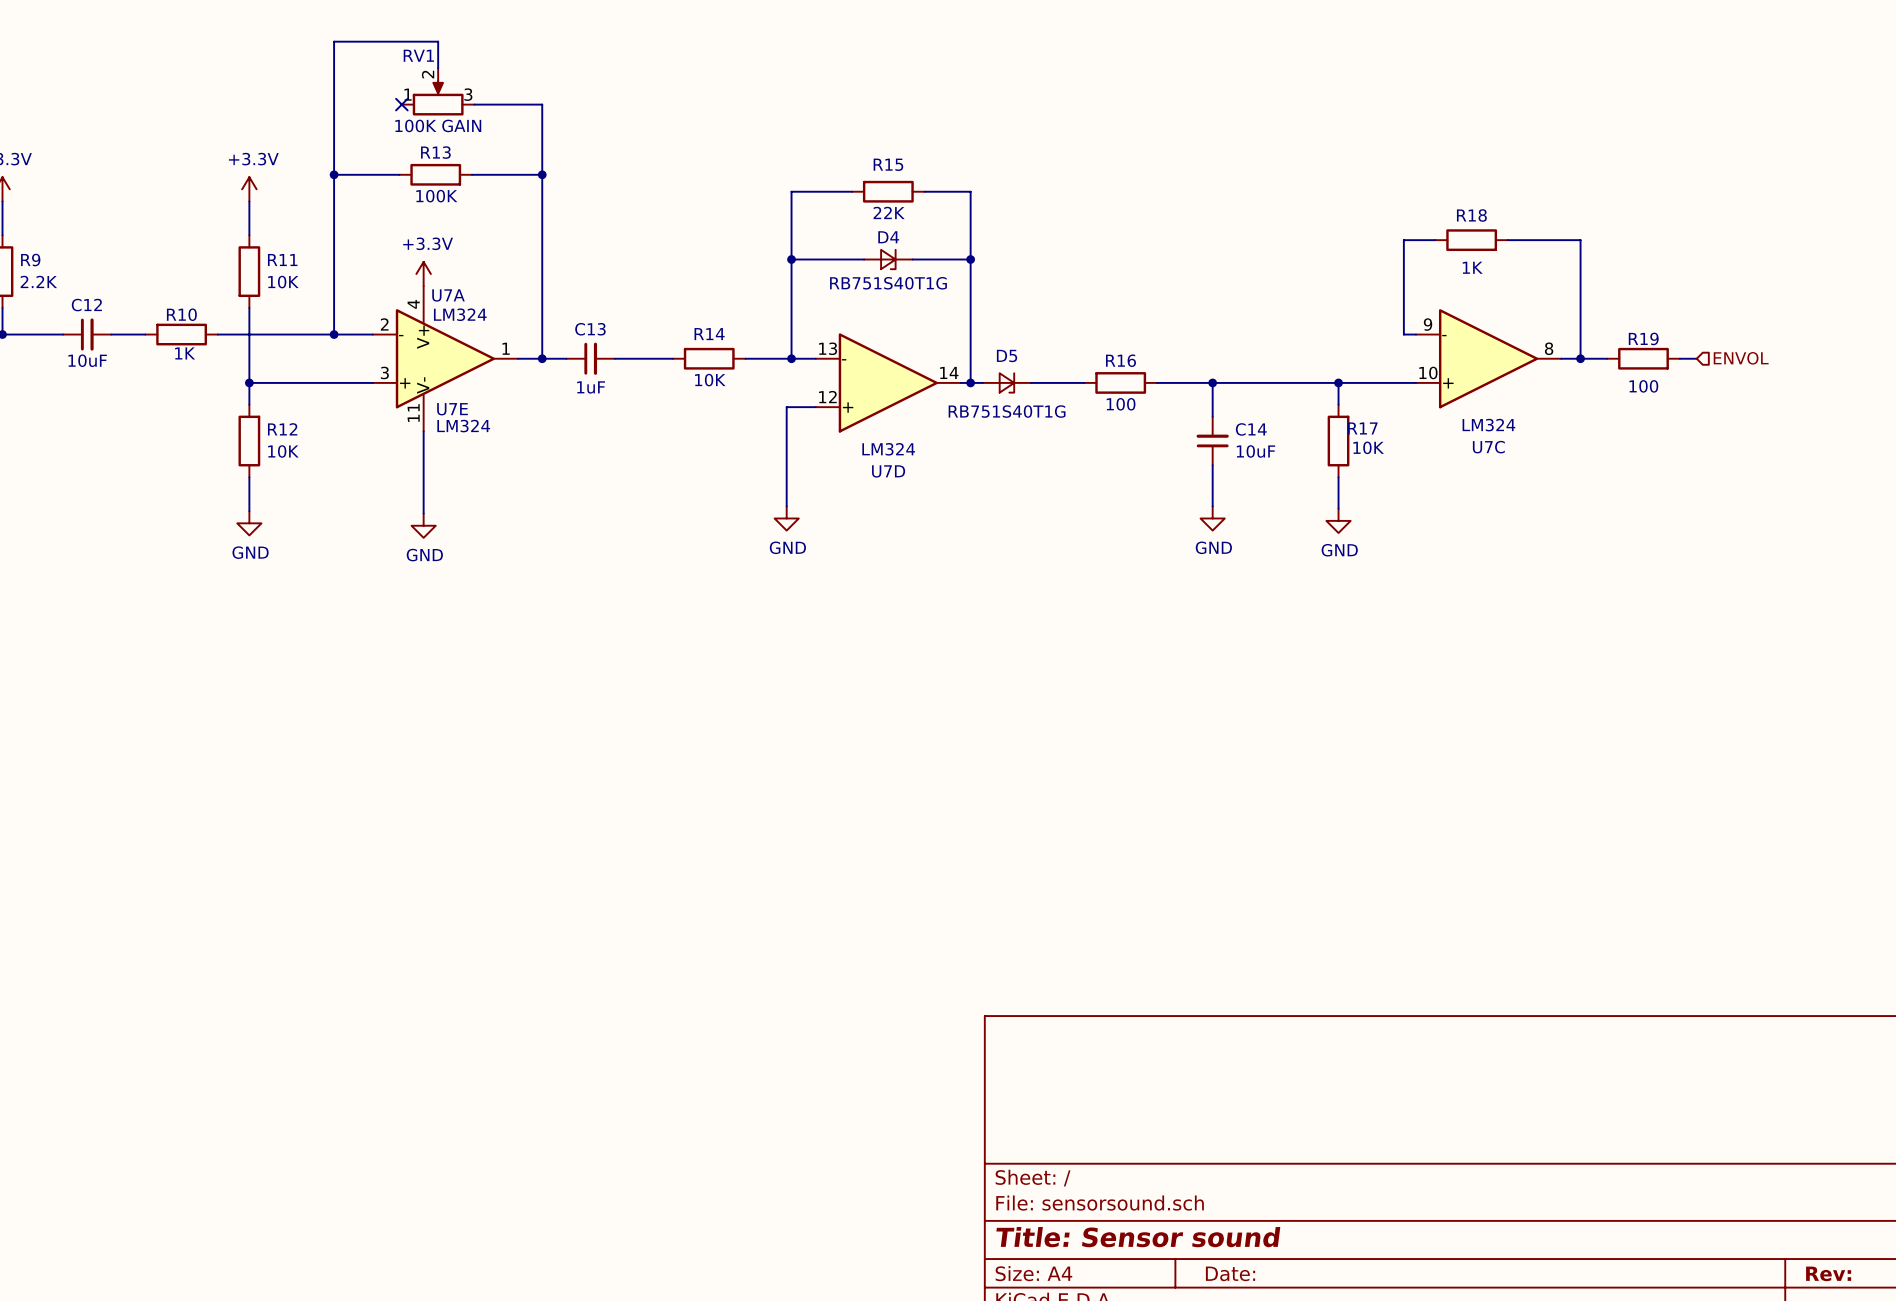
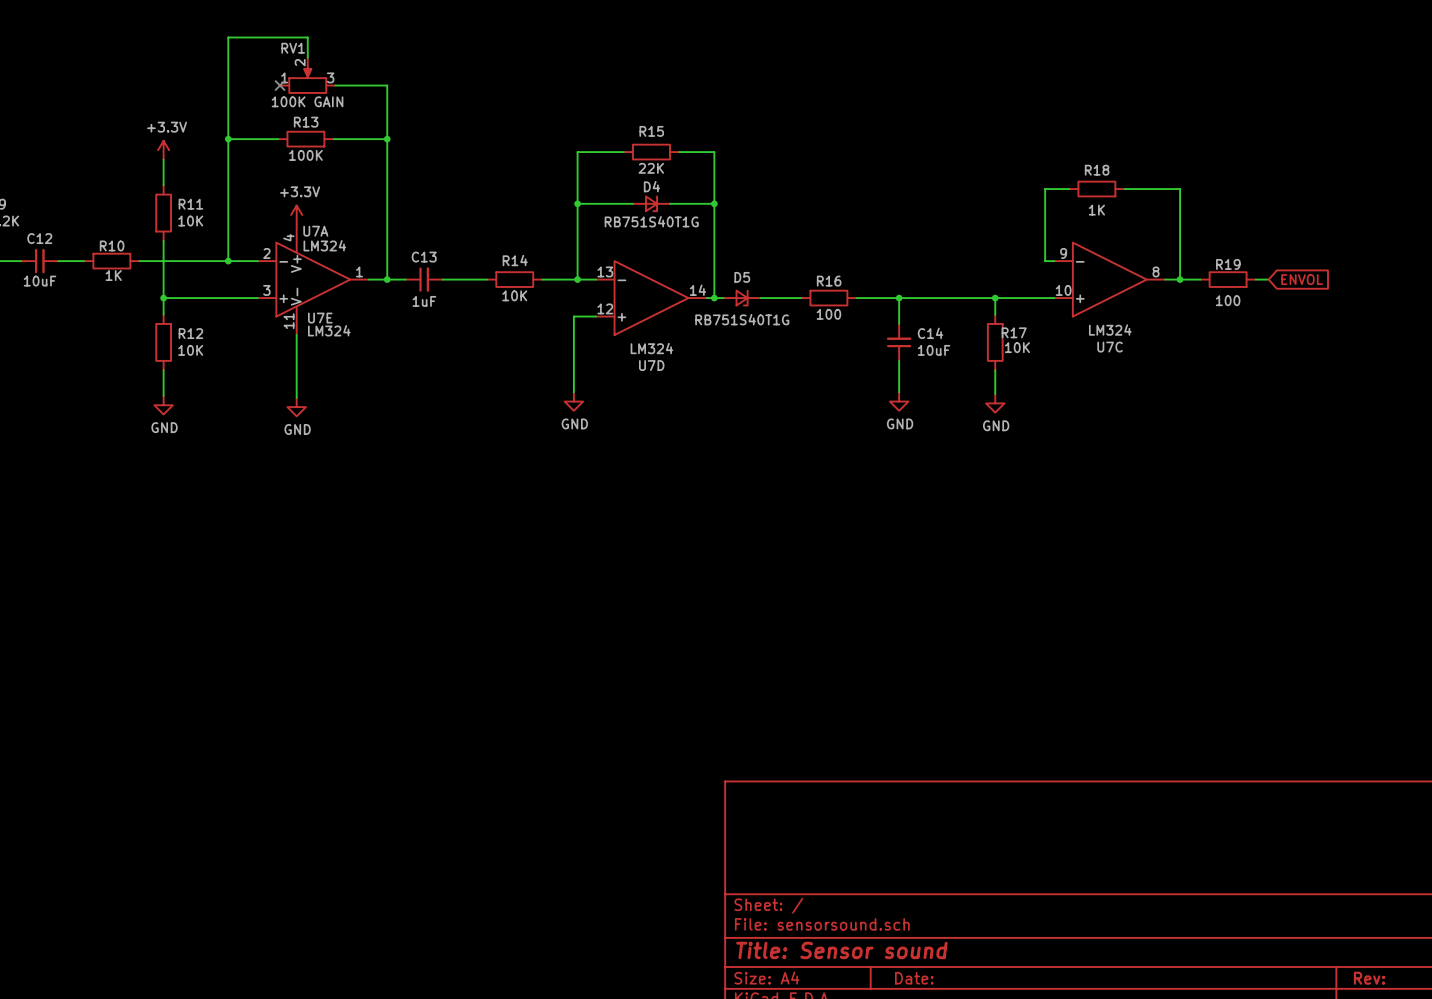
global label: none -> ENVOL (1302, 279)
hierarchical label: ENVOL (1741, 358) -> none

